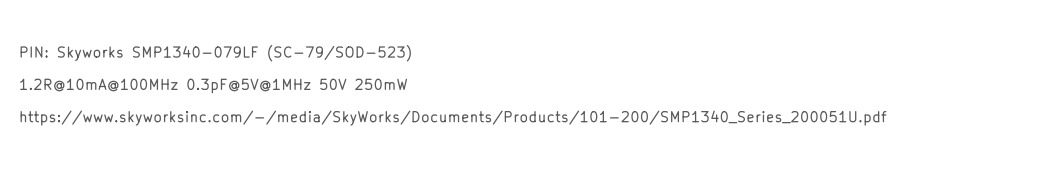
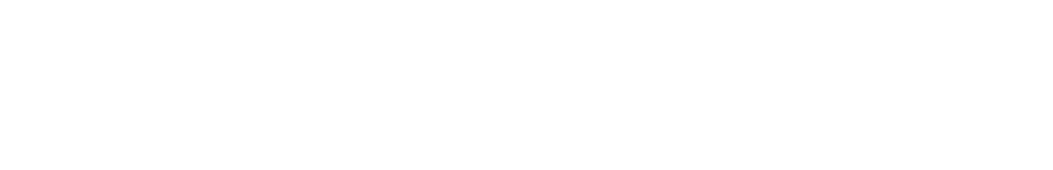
text: PIN: Skyworks SMP1340-079LF (SC-79/SOD-523) (215, 53) -> none
text: 1.2R@10mA@100MHz 0.3pF@5V@1MHz 50V 250mW (213, 86) -> none
text: https://www.skyworksinc.com/-/media/SkyWorks/Documents/Products/101-200/SMP1340_Series_200051U.pdf (453, 118) -> none

